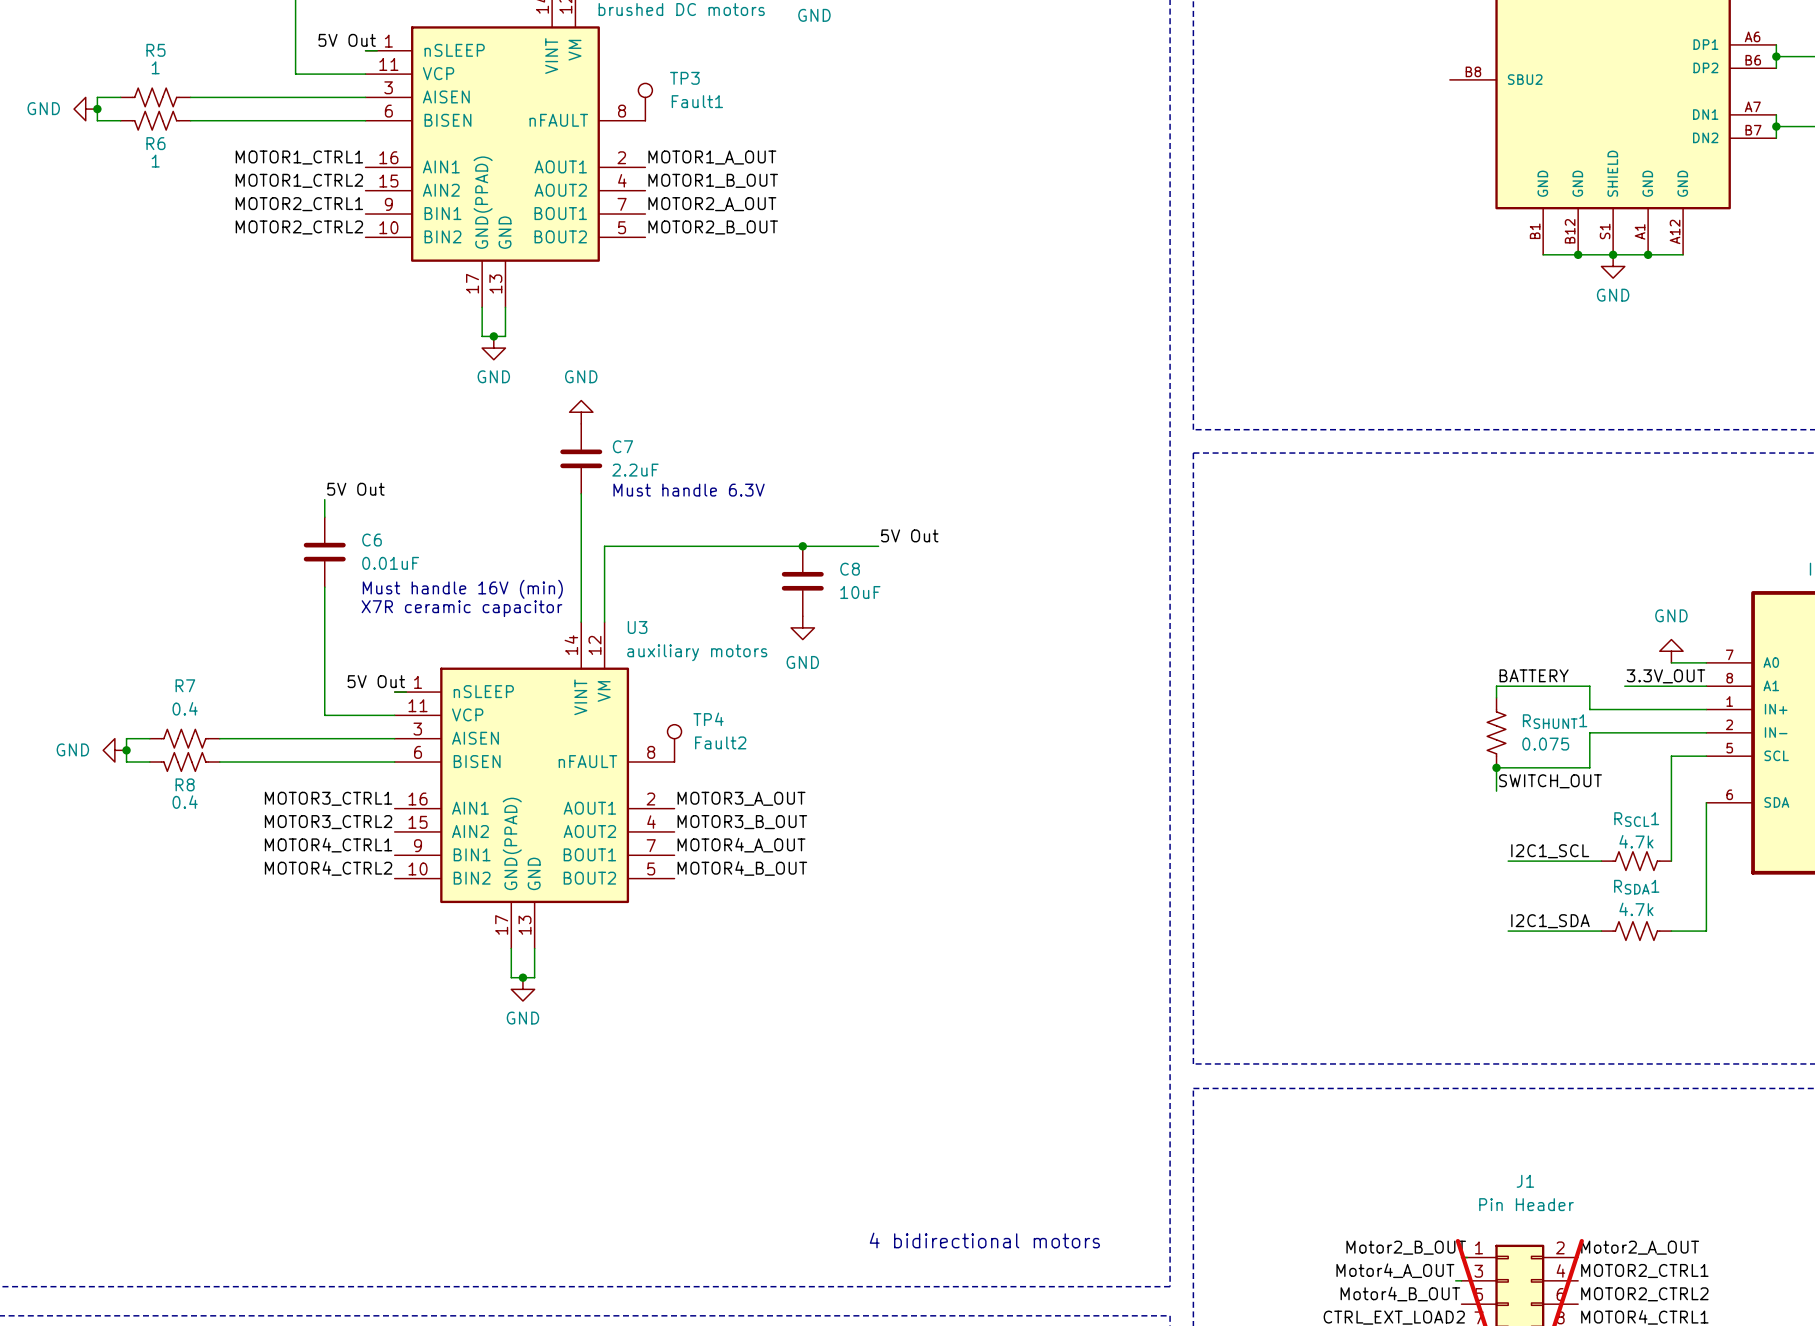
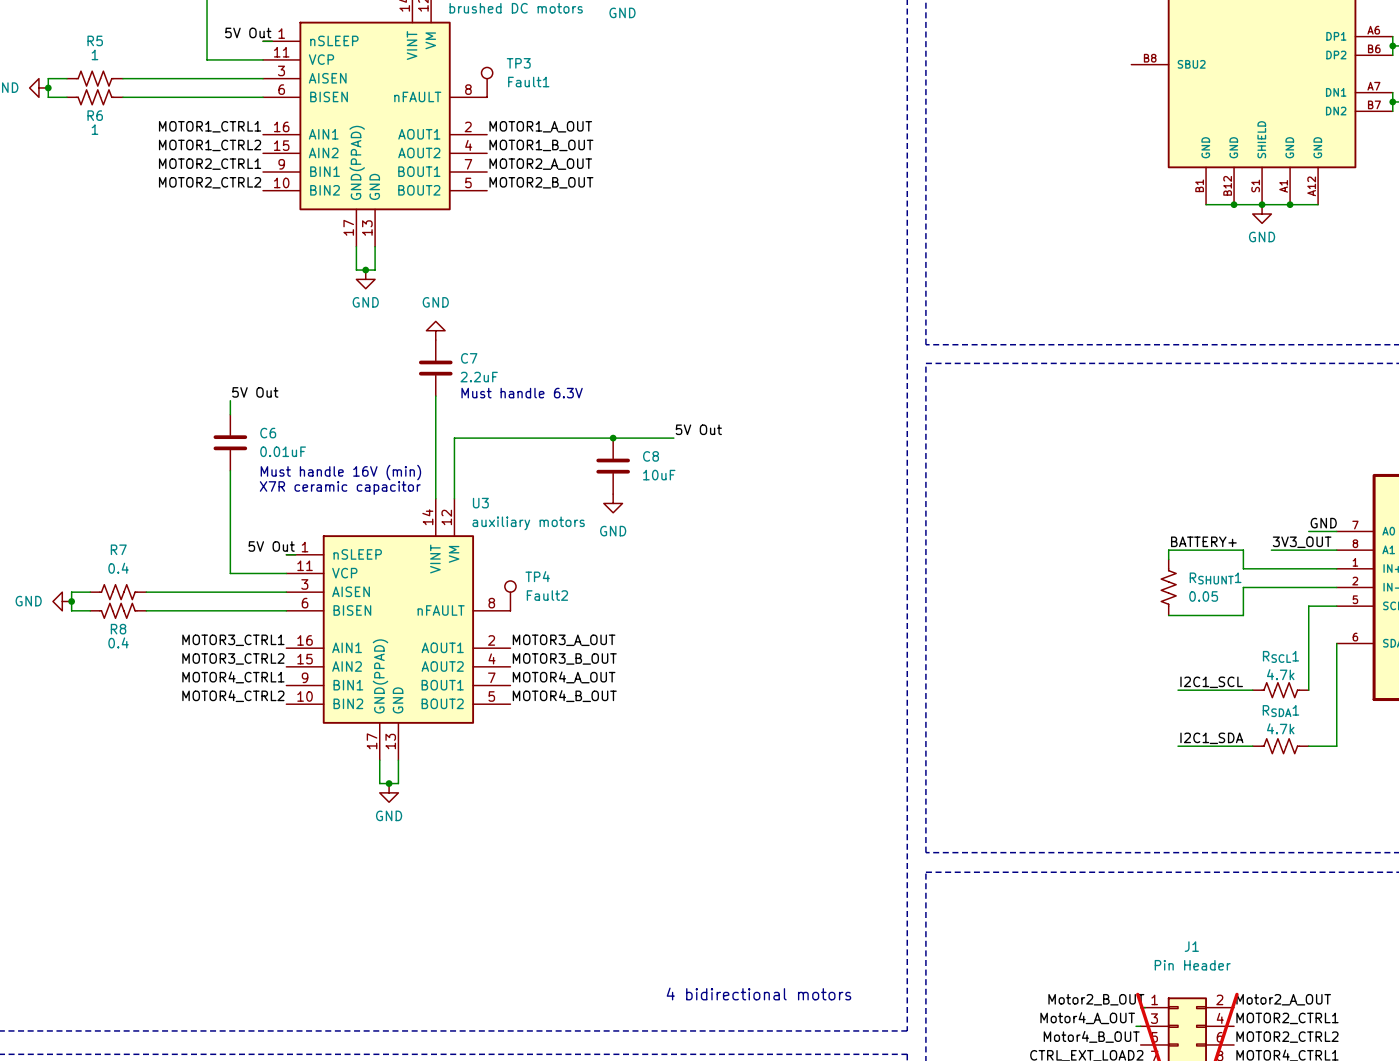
power symbol: GND (1671, 651) -> none
label: none -> GND (1323, 523)
label: BATTERY (1534, 675) -> BATTERY+ (1203, 541)
label: 3.3V_OUT (1665, 676) -> 3V3_OUT (1302, 542)
RSHUNT1 value: 0.075 (1545, 744) -> 0.05 (1203, 596)
wire: (1496, 767) (1496, 791) -> none
junction: (1496, 767) -> none
label: SWITCH_OUT (1550, 781) -> none

